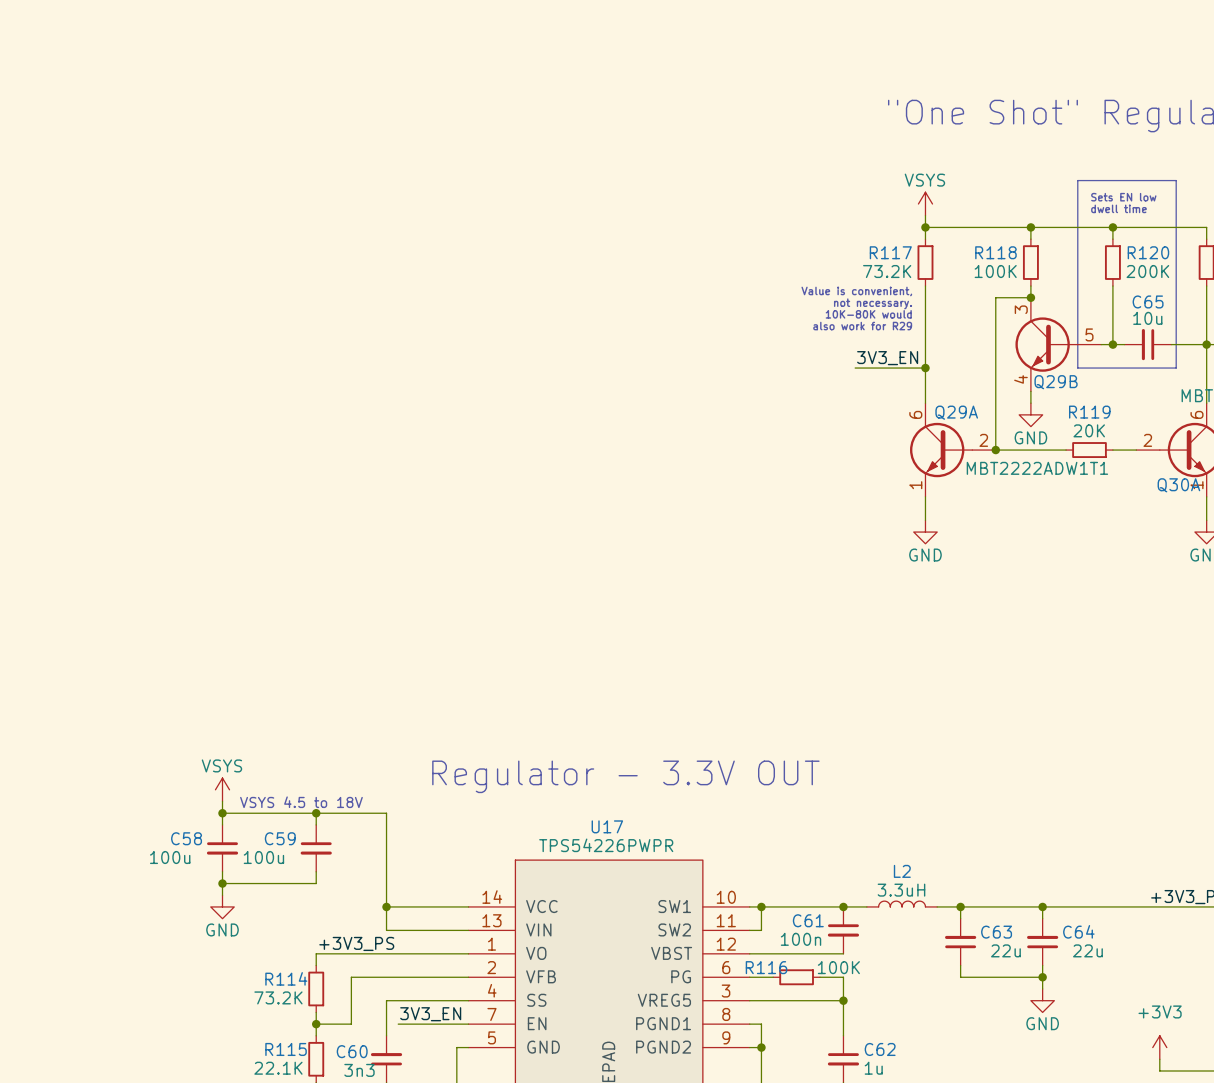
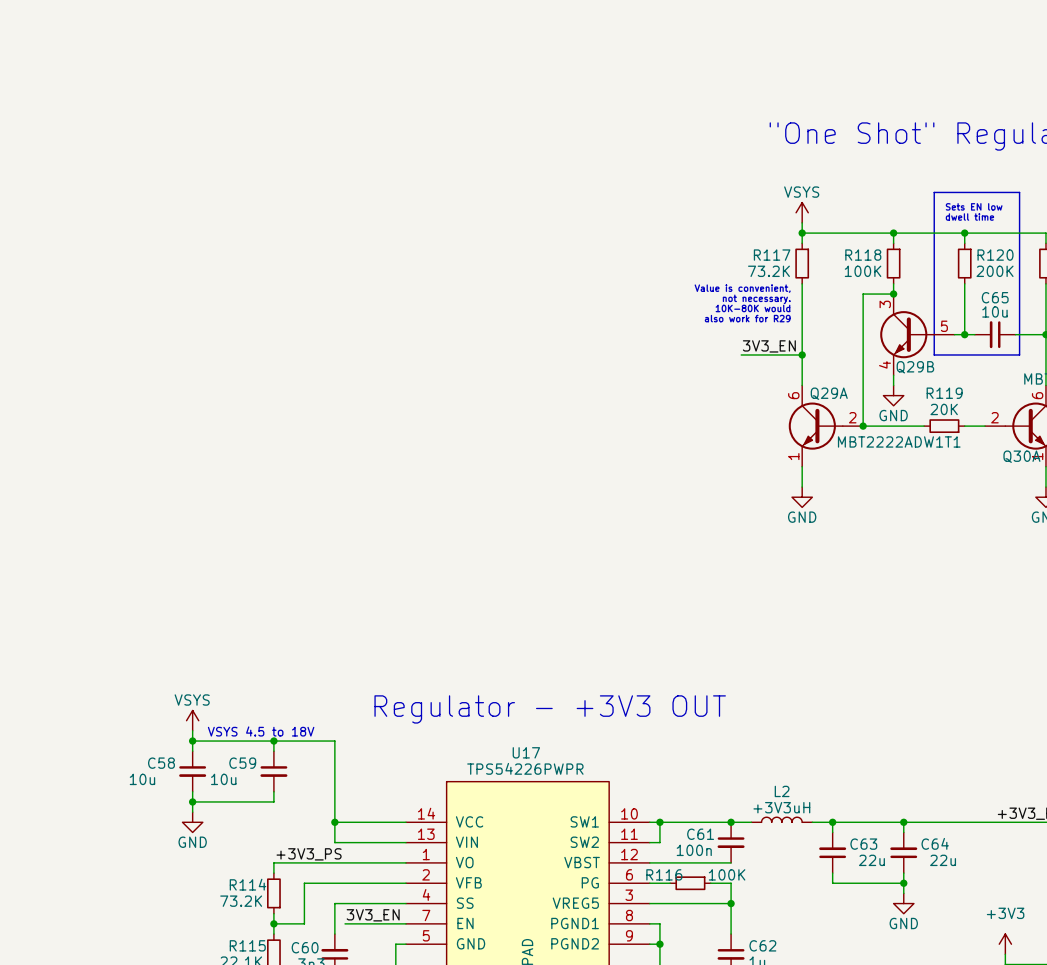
text: Regulator - 3.3V OUT (625, 776) -> Regulator - +3V3 OUT (550, 709)
C58 value: 100u (170, 857) -> 10u (142, 779)
C59 value: 100u (263, 857) -> 10u (223, 779)
L2 value: 3.3uH (901, 890) -> +3V3uH (781, 807)

